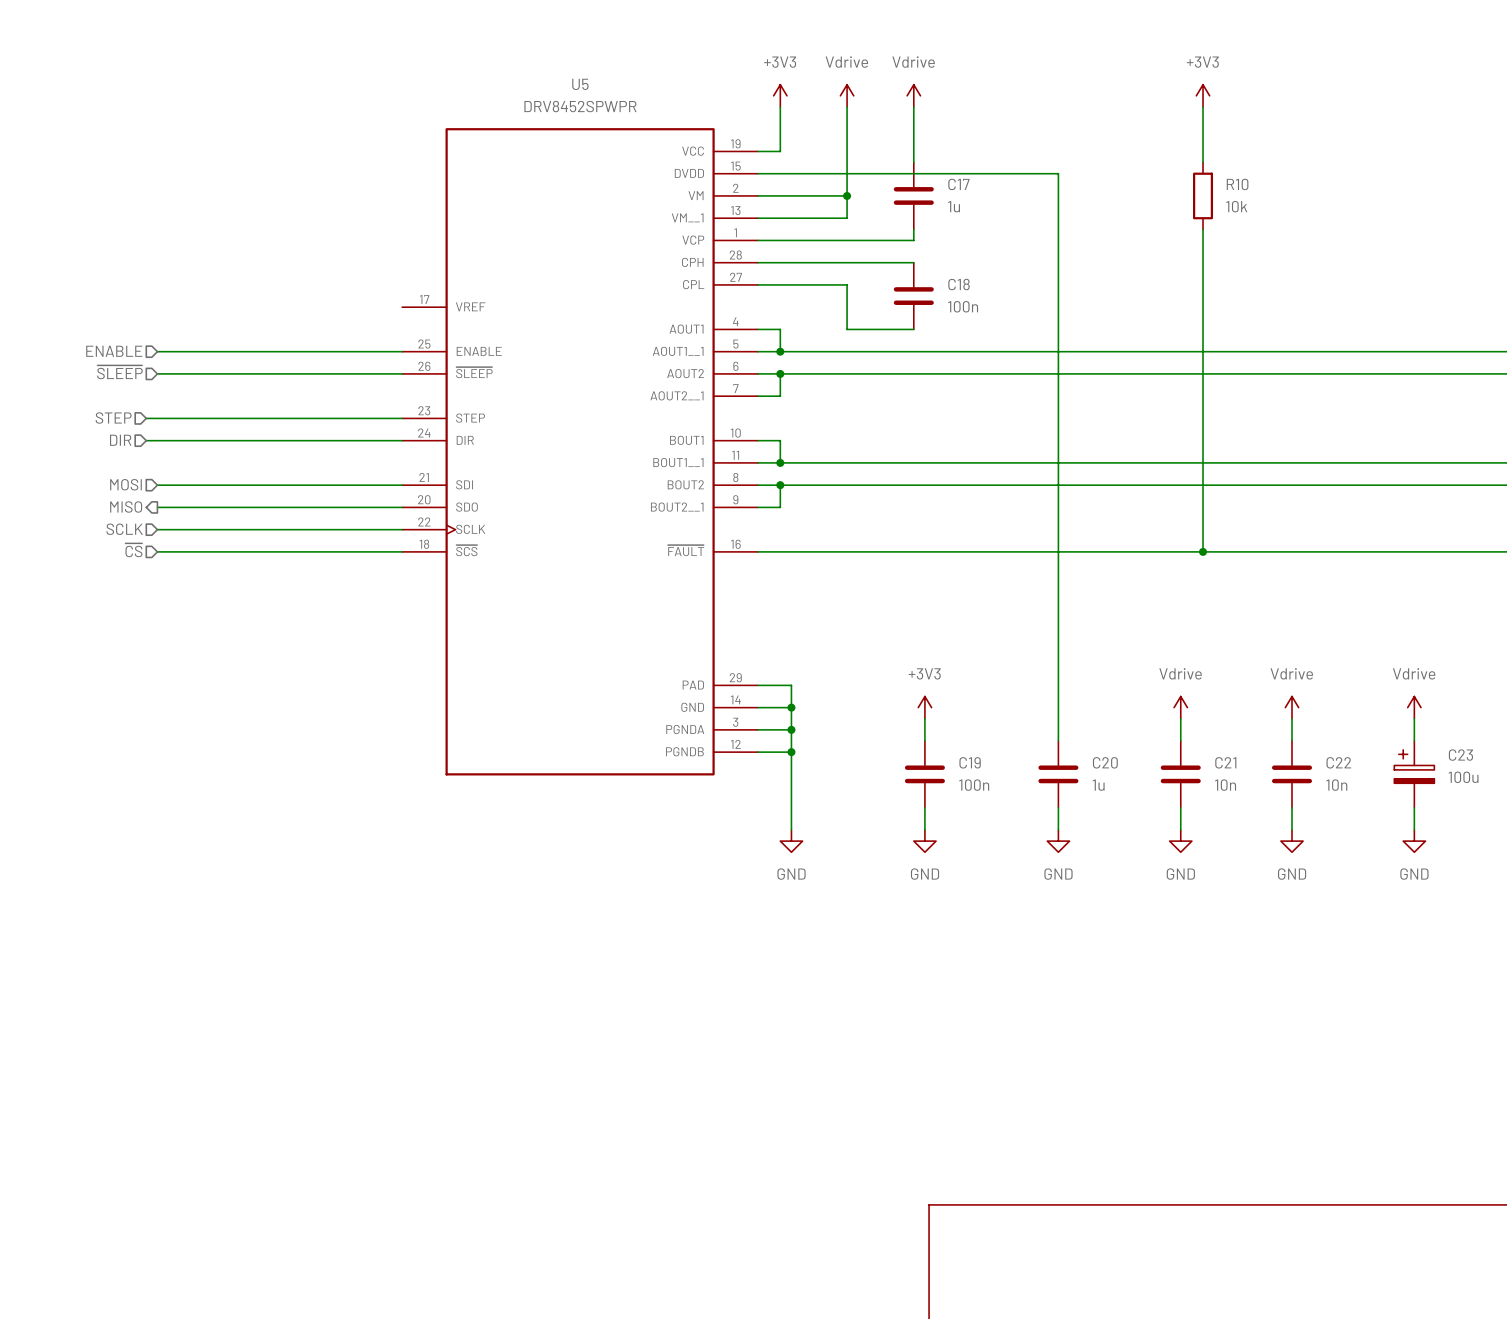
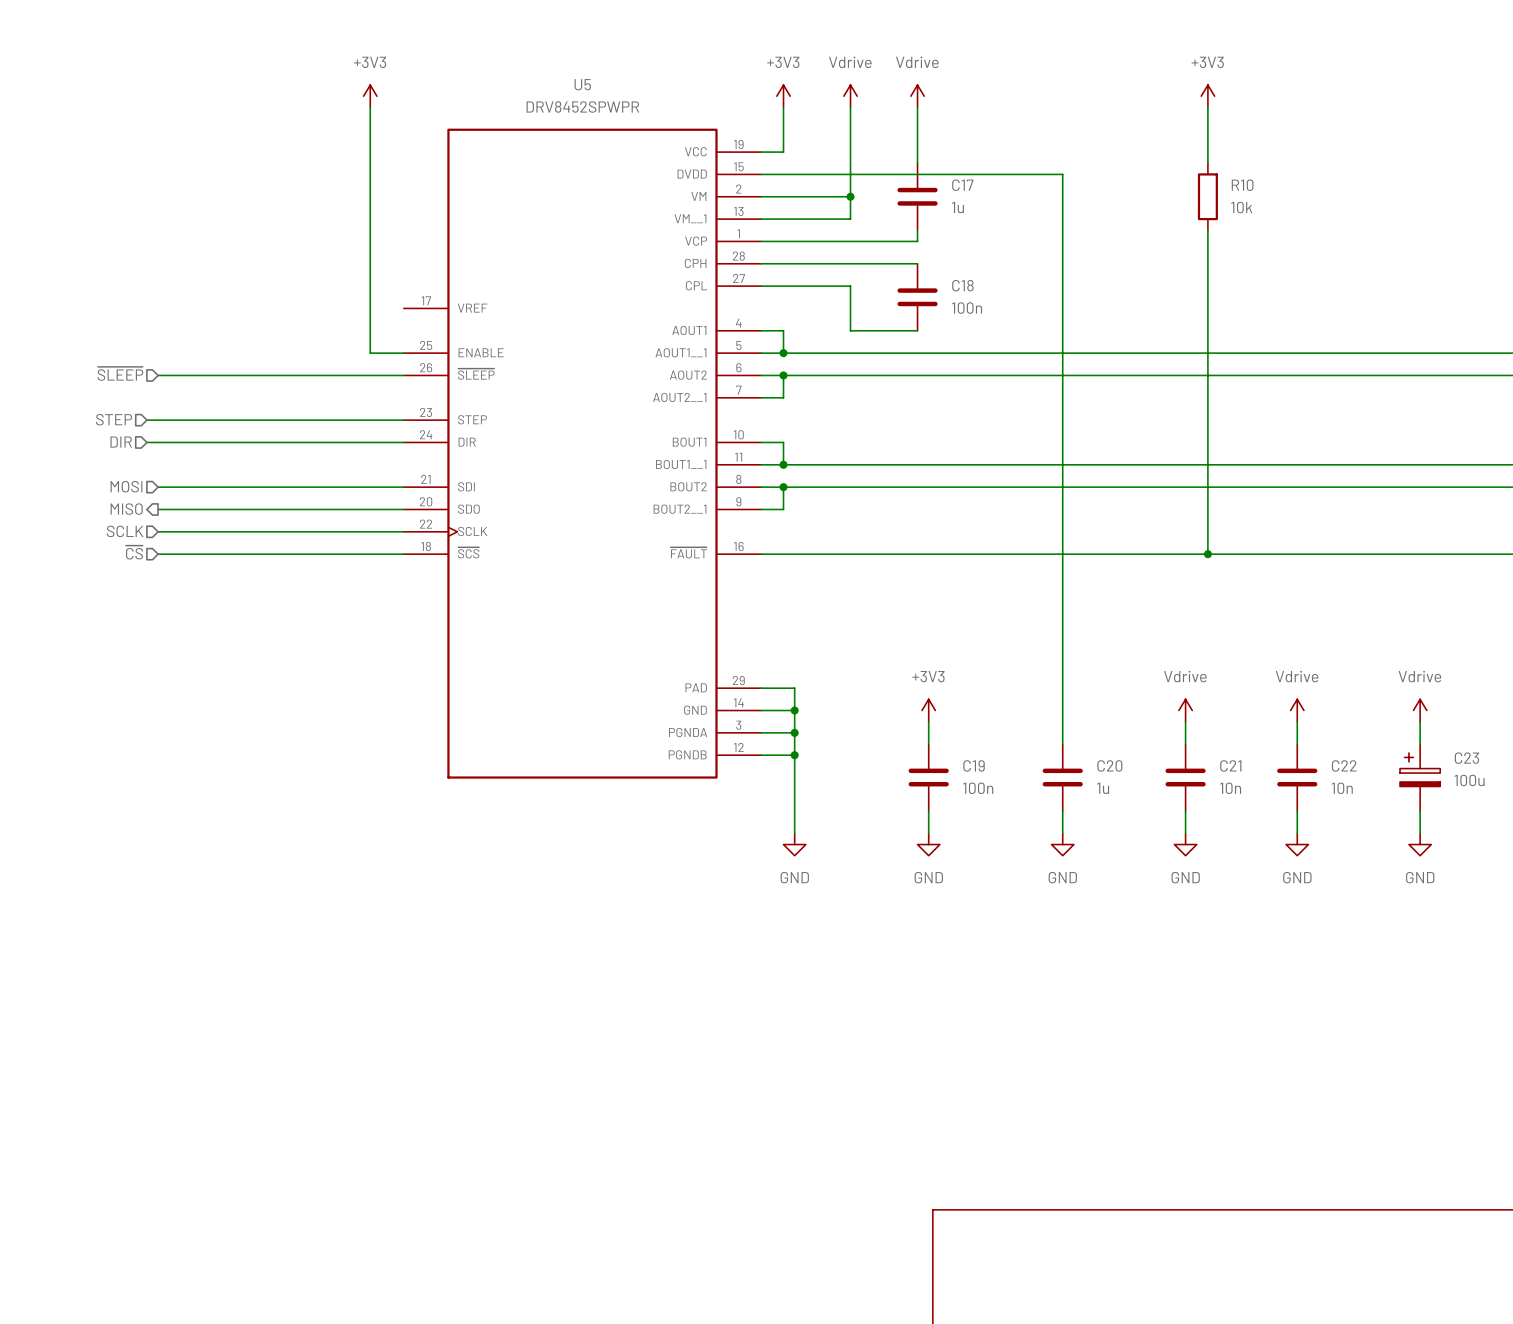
power symbol: none -> +3V3 (370, 96)
hierarchical label: ENABLE (114, 351) -> none
wire: (157, 351) (368, 351) -> (370, 107) (370, 353)

